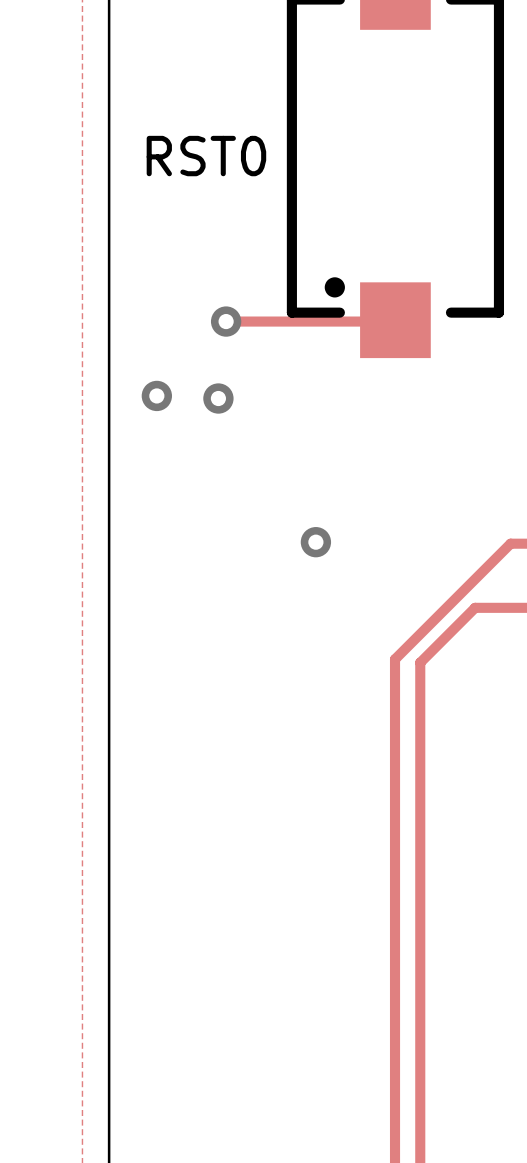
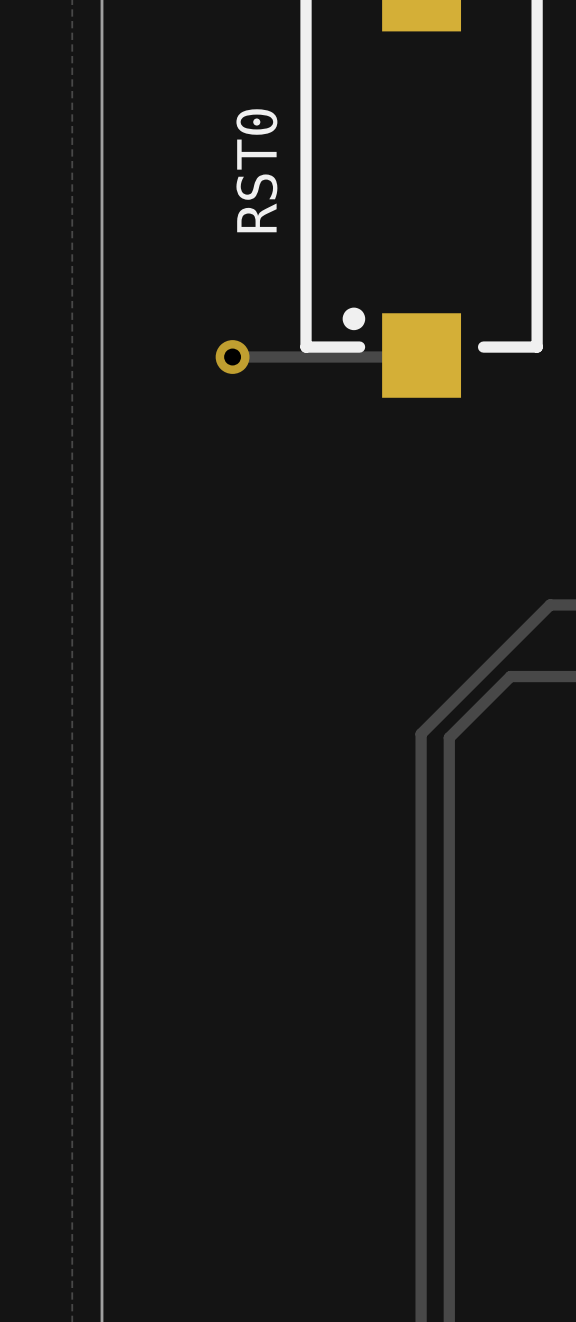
RST0 name rotation: 0° (206, 156) -> 90° counterclockwise (256, 170)
via: (156, 395) -> none
via: (218, 398) -> none
via: (315, 542) -> none

